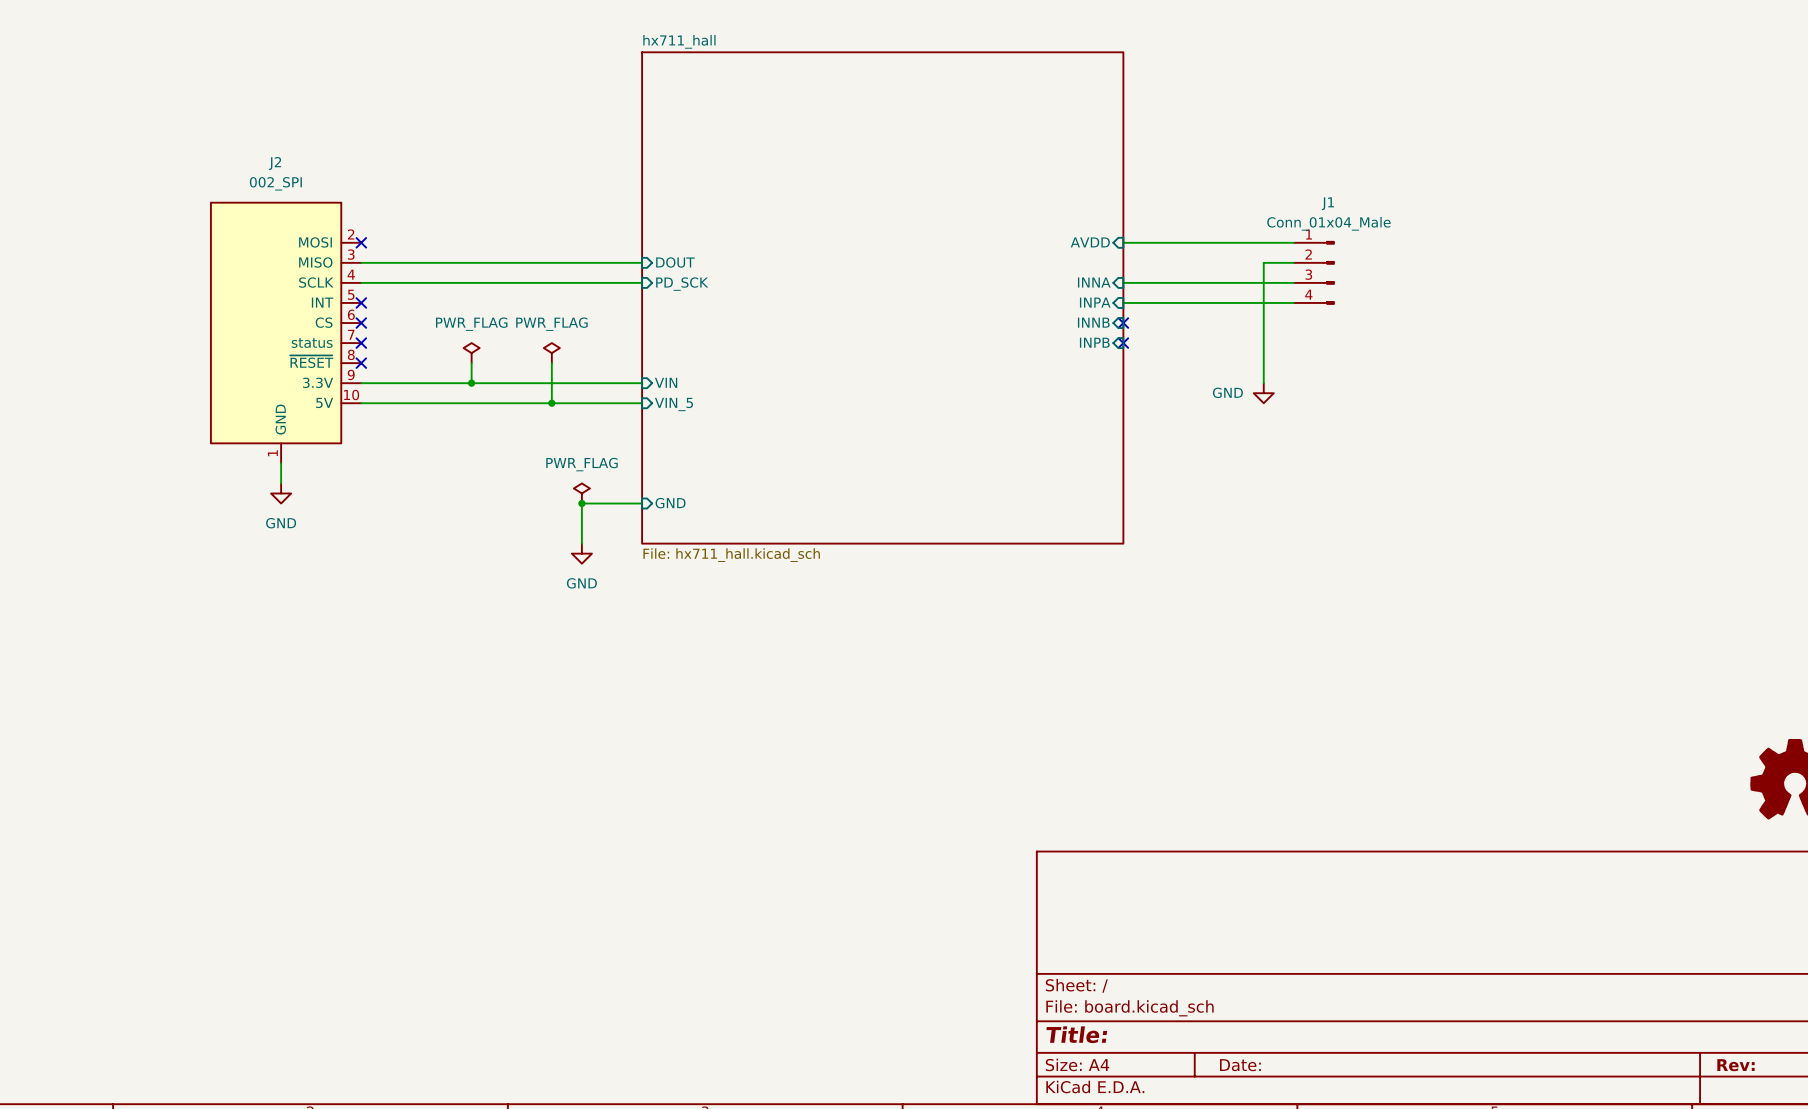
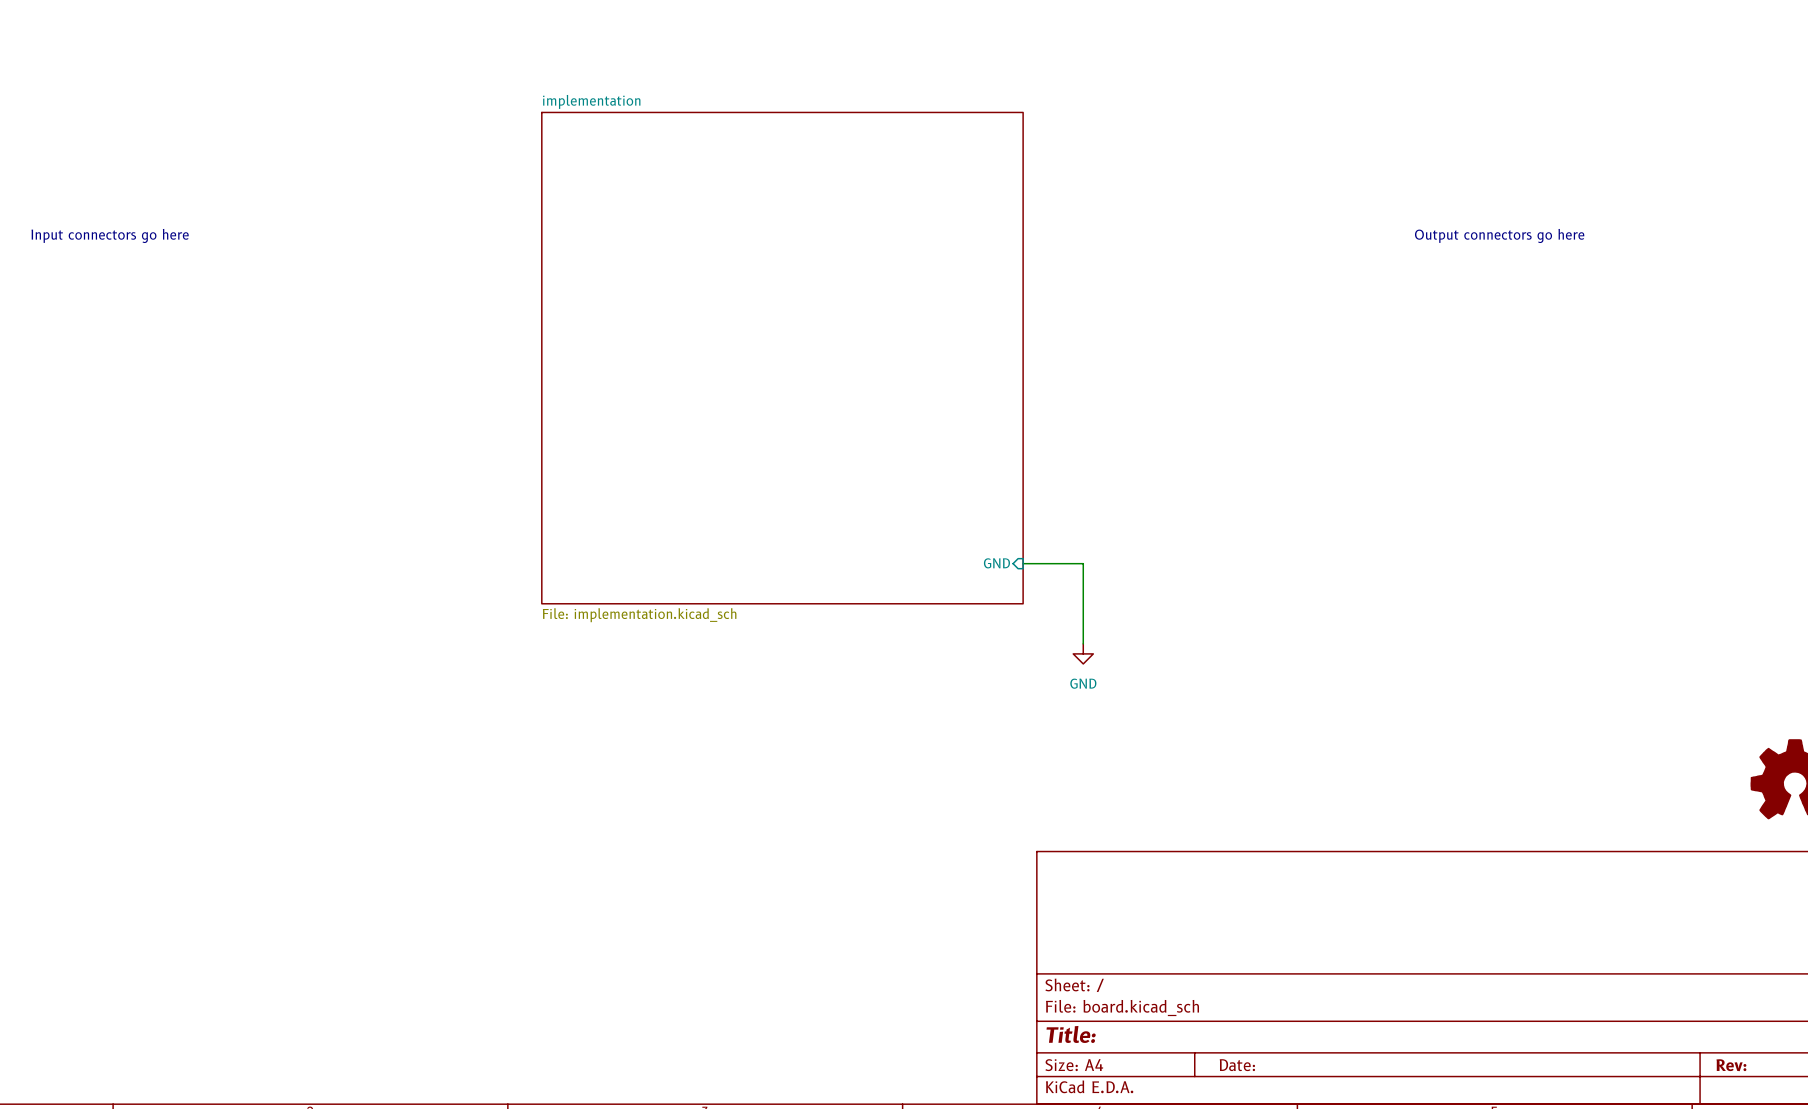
text: none -> Input connectors go here (110, 235)
text: none -> Output connectors go here (1499, 235)
no-connect mark: (361, 242) -> none
sheet pin: AVDD (1090, 242) -> none
wire: (1123, 242) (1293, 242) -> none
wire: (361, 262) (642, 262) -> none
sheet pin: DOUT (675, 262) -> none
wire: (1293, 262) (1263, 262) (1263, 383) -> none
J1: Conn_01x04_Male (1314, 272) -> none
wire: (361, 282) (642, 282) -> none
sheet pin: INNA (1094, 282) -> none
wire: (1123, 282) (1293, 282) -> none
sheet pin: PD_SCK (682, 284) -> none
sheet hx711_hall: File: hx711_hall.kicad_sch (882, 297) -> none
no-connect mark: (361, 302) -> none
sheet pin: INPA (1095, 302) -> none
wire: (1123, 302) (1293, 302) -> none
sheet pin: INNB (1093, 322) -> none
no-connect mark: (361, 323) -> none
no-connect mark: (1123, 323) -> none
J2: 002_SPI (286, 333) -> none
sheet pin: INPB (1094, 342) -> none
no-connect mark: (361, 343) -> none
no-connect mark: (1123, 343) -> none
power symbol: PWR_FLAG (471, 353) -> none
power symbol: PWR_FLAG (551, 353) -> none
sheet implementation: none -> File: implementation.kicad_sch (782, 358)
no-connect mark: (361, 363) -> none
wire: (471, 363) (471, 383) -> none
wire: (551, 363) (551, 403) -> none
sheet pin: VIN (666, 382) -> none
wire: (361, 383) (642, 383) -> none
junction: (471, 383) -> none
power symbol: GND (1263, 393) -> none
wire: (361, 403) (642, 403) -> none
junction: (551, 403) -> none
sheet pin: VIN_5 (673, 404) -> none
wire: (281, 463) (281, 483) -> none
power symbol: GND (281, 493) -> none
power symbol: PWR_FLAG (581, 493) -> none
junction: (581, 503) -> none
wire: (642, 503) (581, 503) (581, 543) -> none
sheet pin: GND (670, 503) -> none
power symbol: GND (581, 553) -> none
sheet pin: none -> GND (996, 563)
wire: none -> (1023, 563) (1083, 563) (1083, 643)
power symbol: none -> GND (1083, 653)

